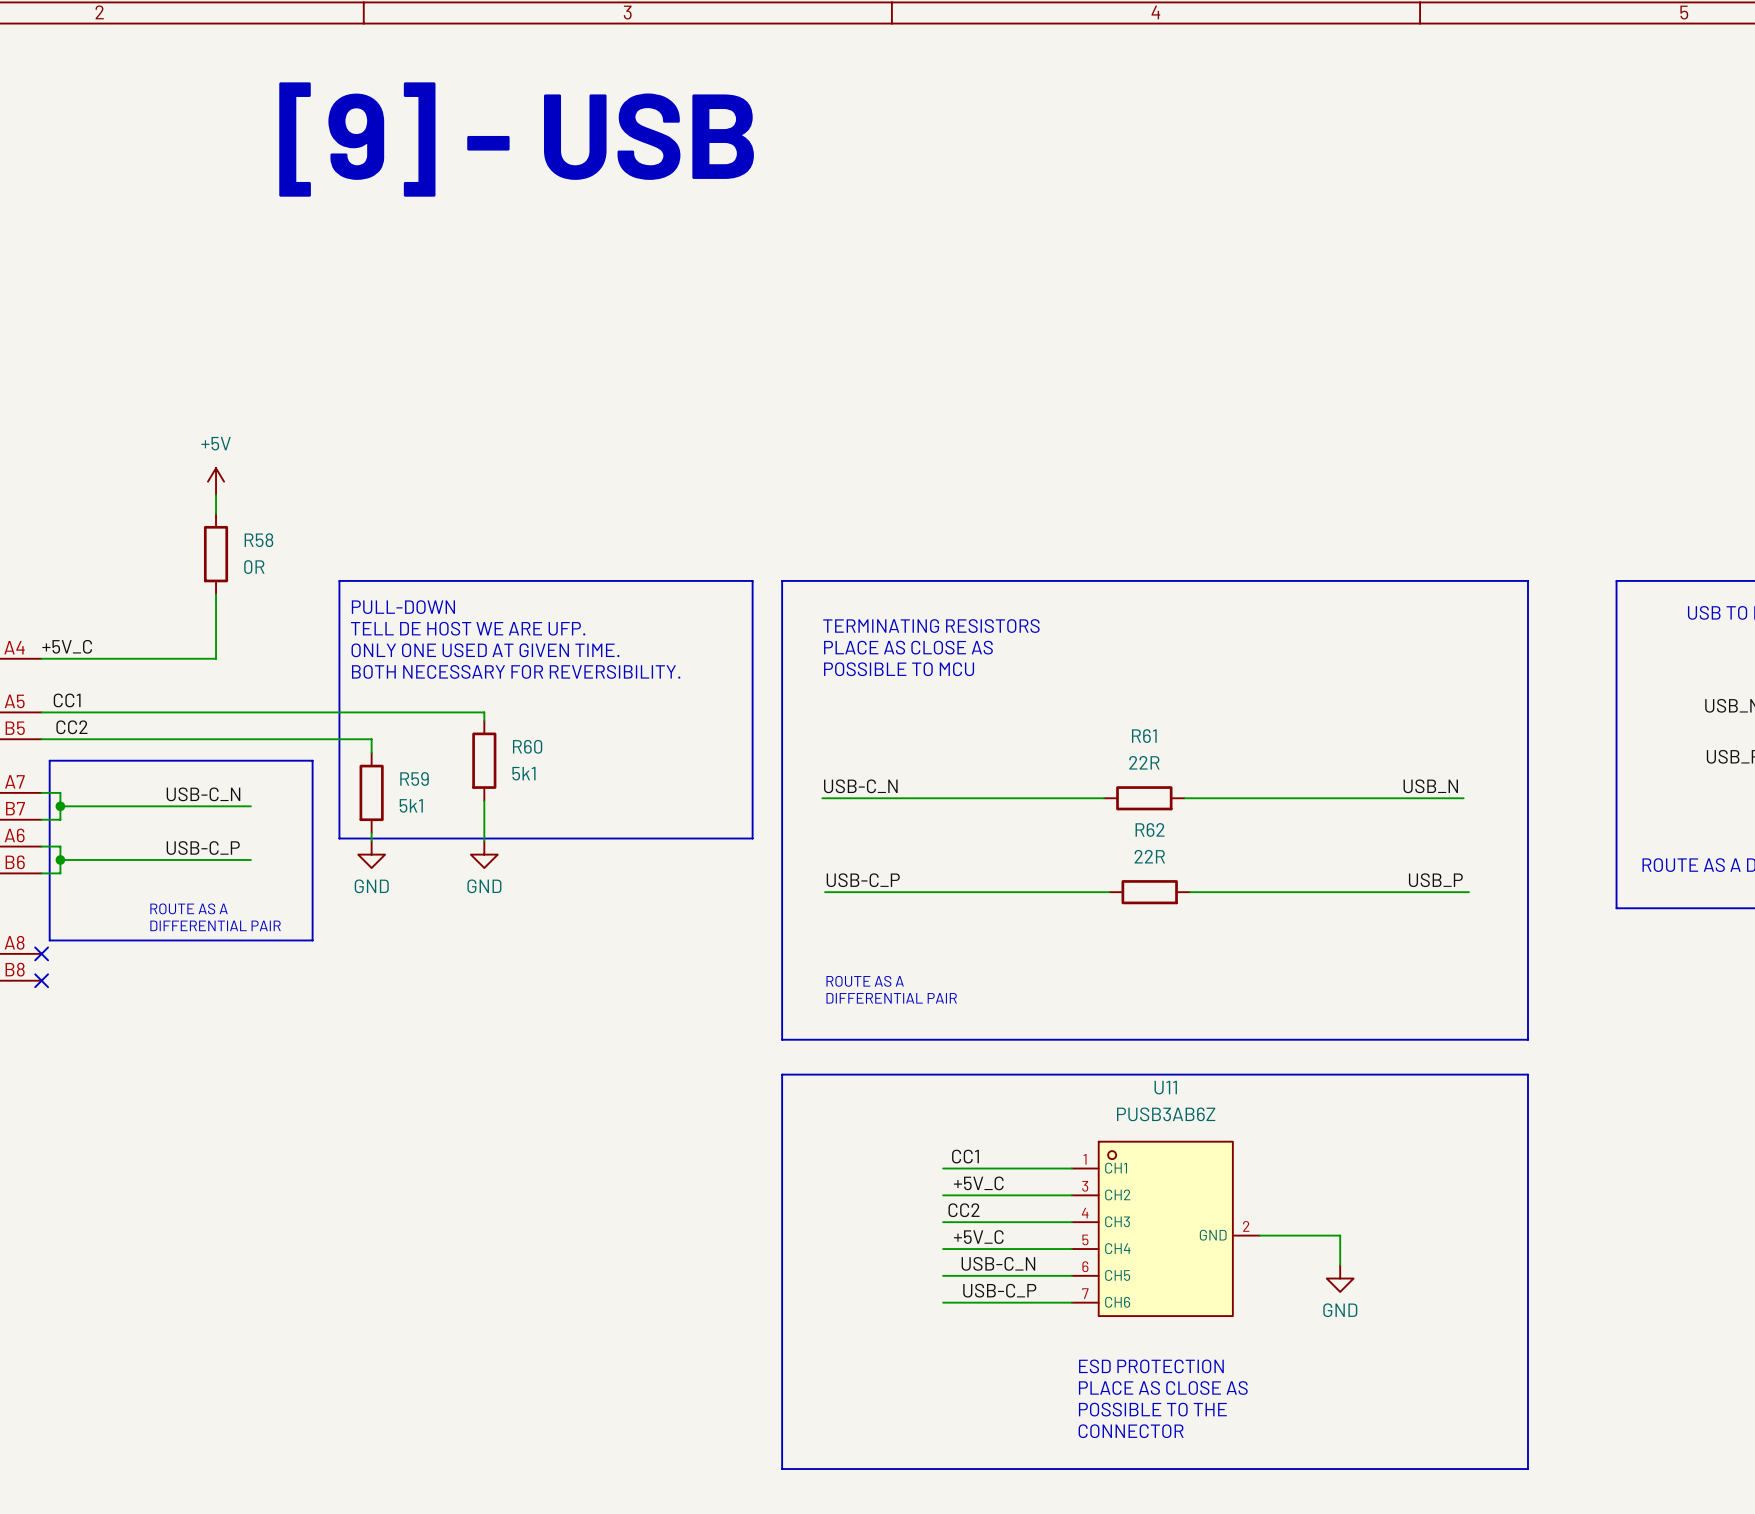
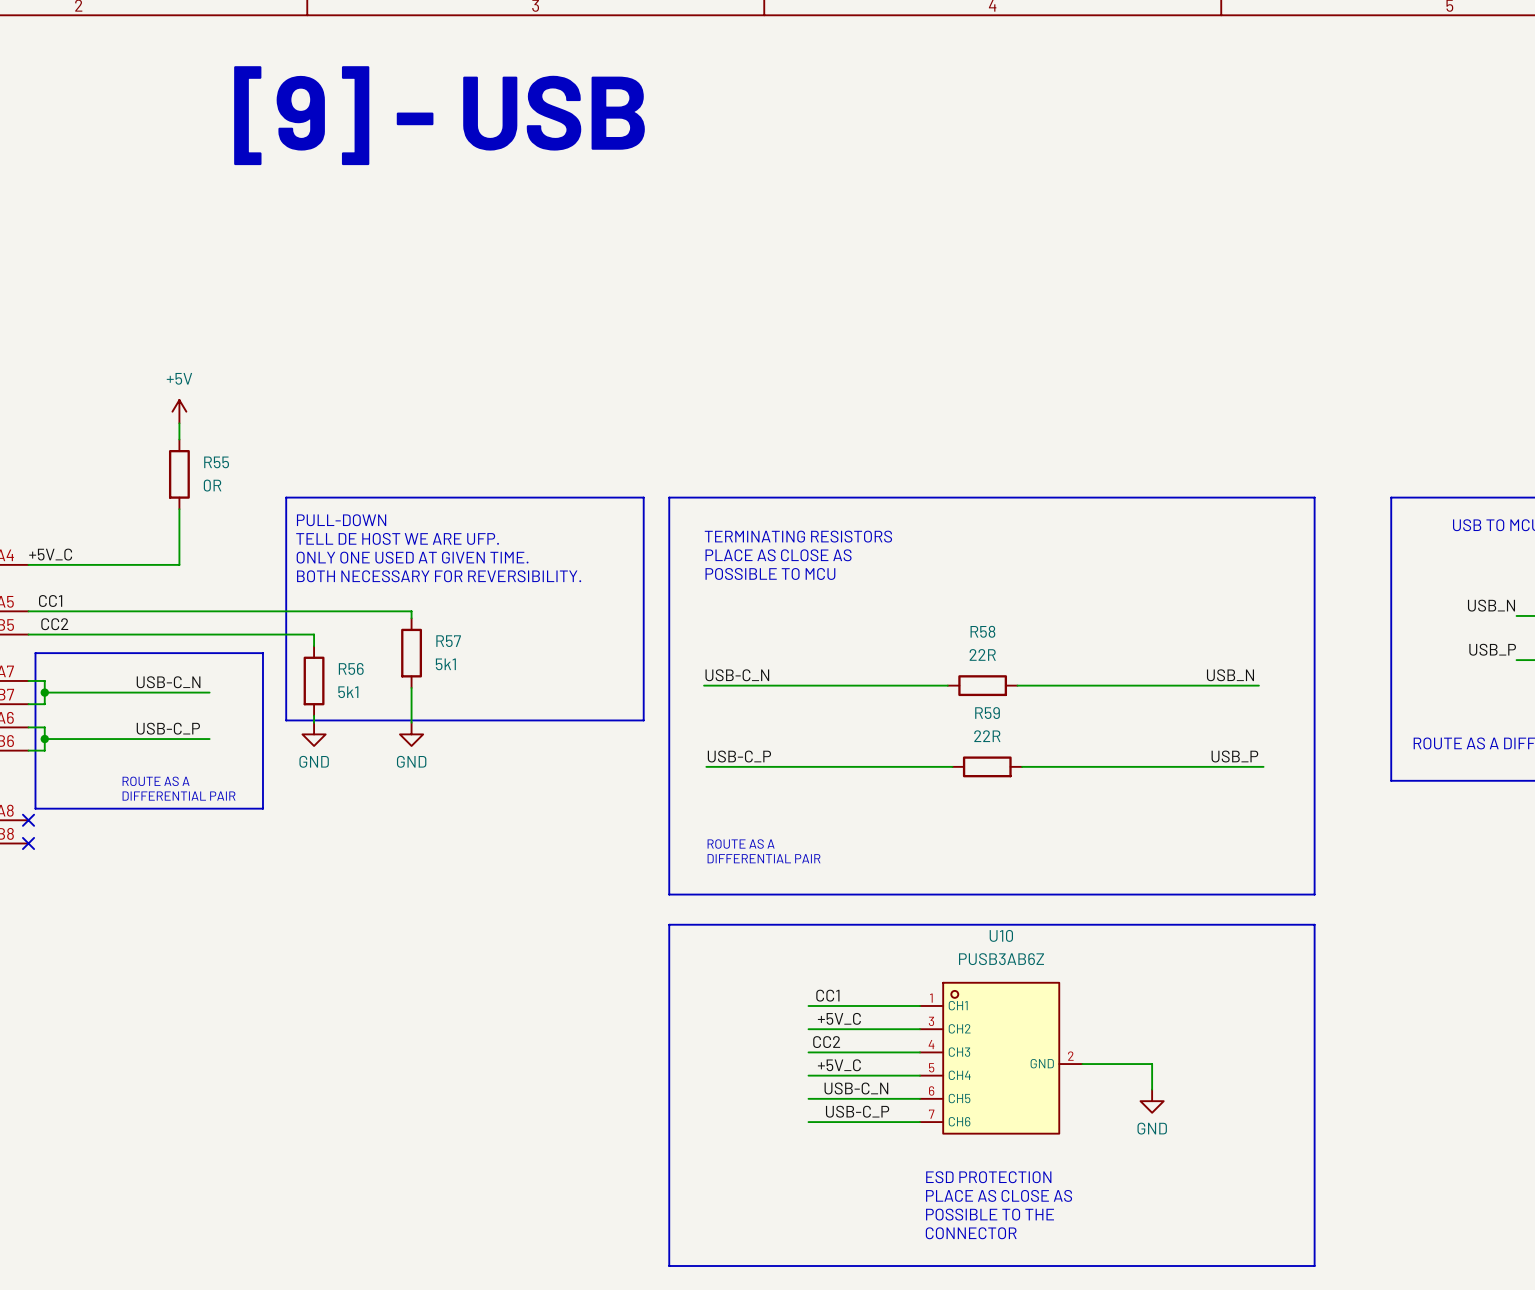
R58 name: R58 (258, 540) -> R55 (216, 462)
R61 name: R61 (1144, 736) -> R58 (982, 631)
R60 name: R60 (527, 746) -> R57 (448, 641)
R59 name: R59 (414, 779) -> R56 (351, 668)
R62 name: R62 (1150, 829) -> R59 (987, 713)
U11 name: U11 (1165, 1087) -> U10 (1001, 935)

